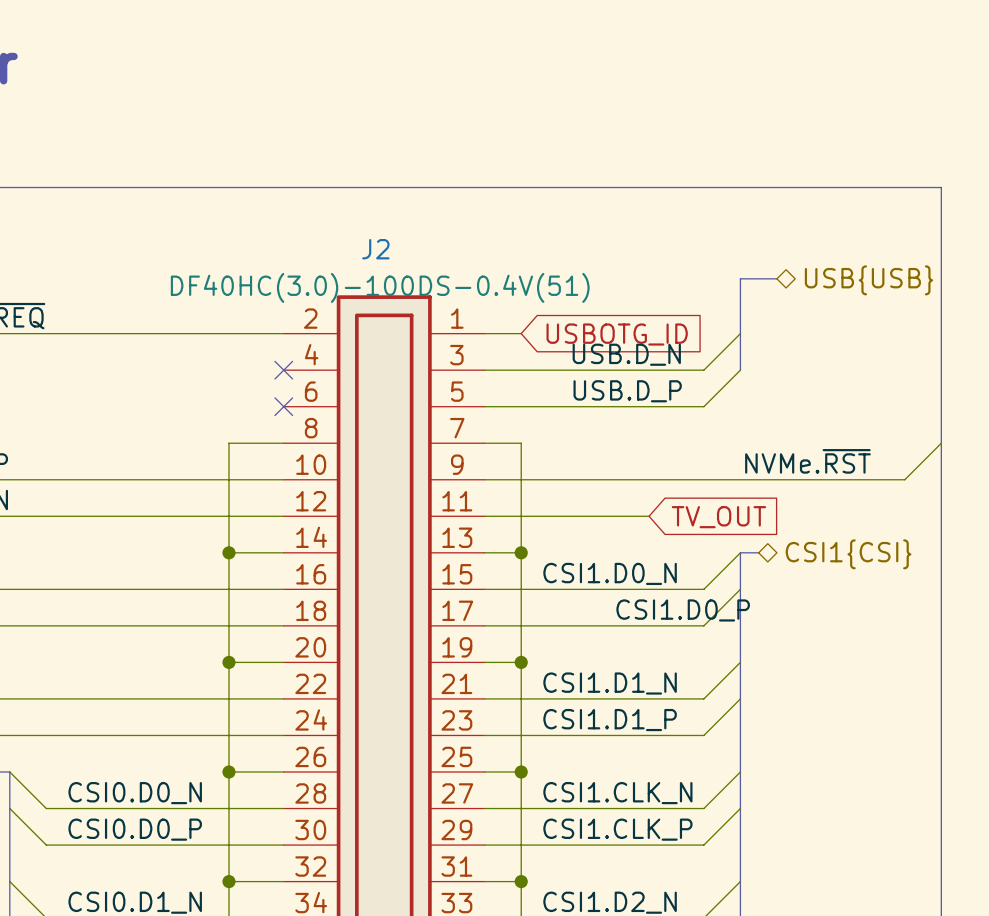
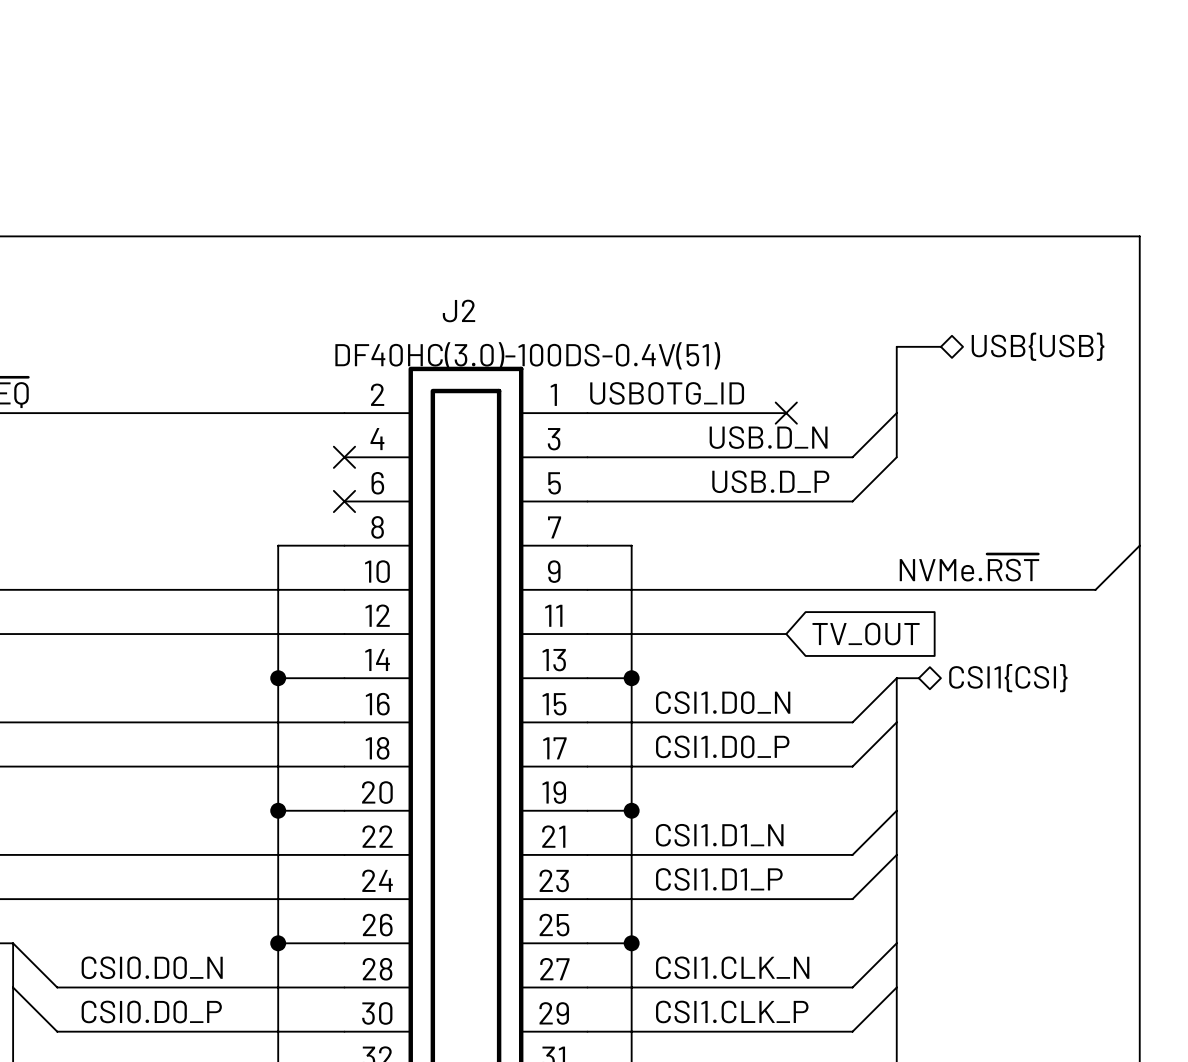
label: none -> USBOTG_ID (667, 393)
wire: none -> (631, 413) (786, 413)
no-connect mark: none -> (786, 413)
global label: USBOTG_ID (617, 334) -> none
label position: CSI1.D0_P (683, 610) -> CSI1.D0_P (722, 746)

